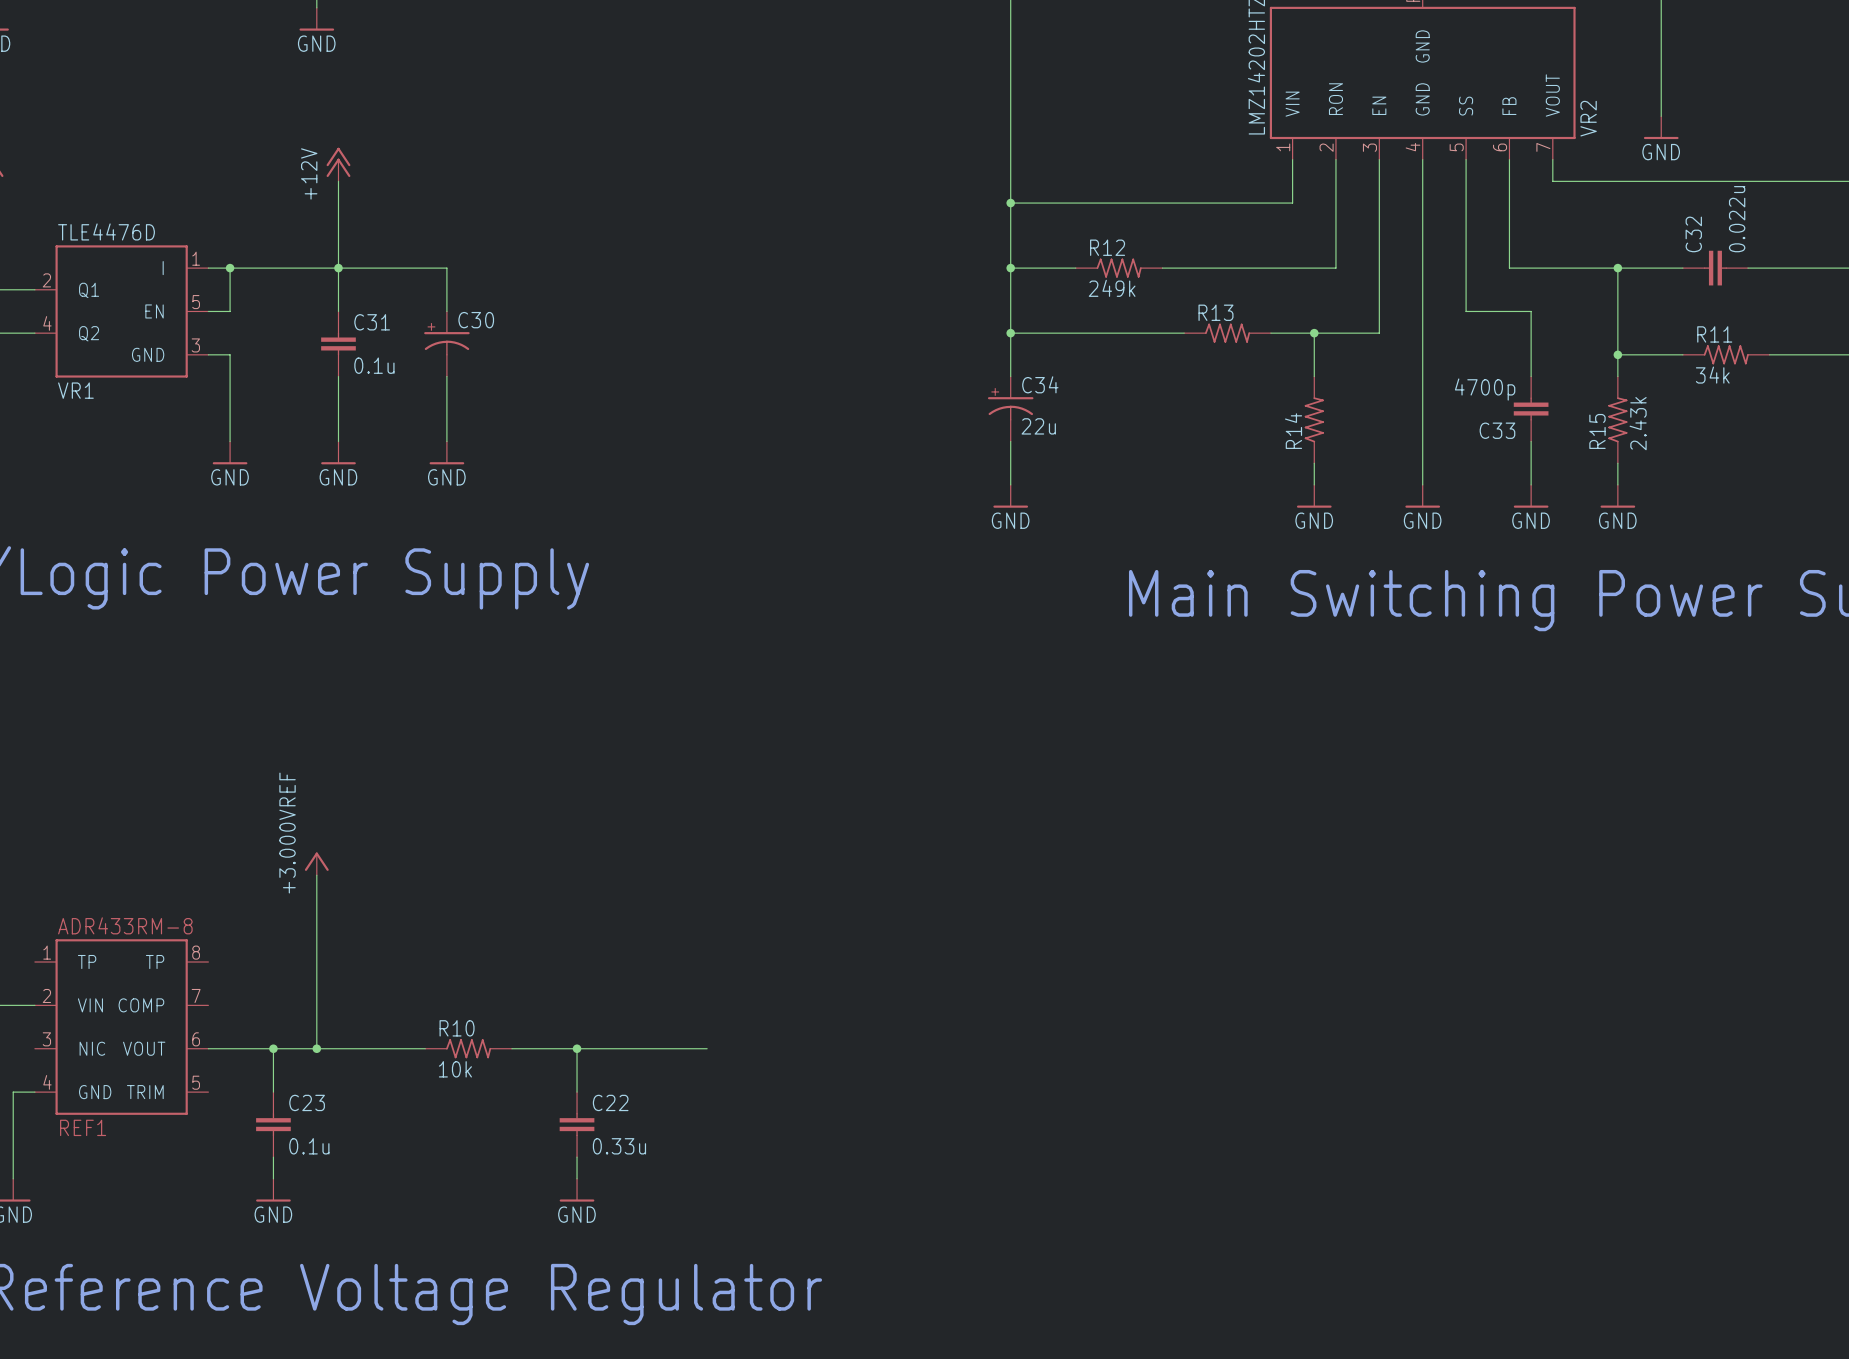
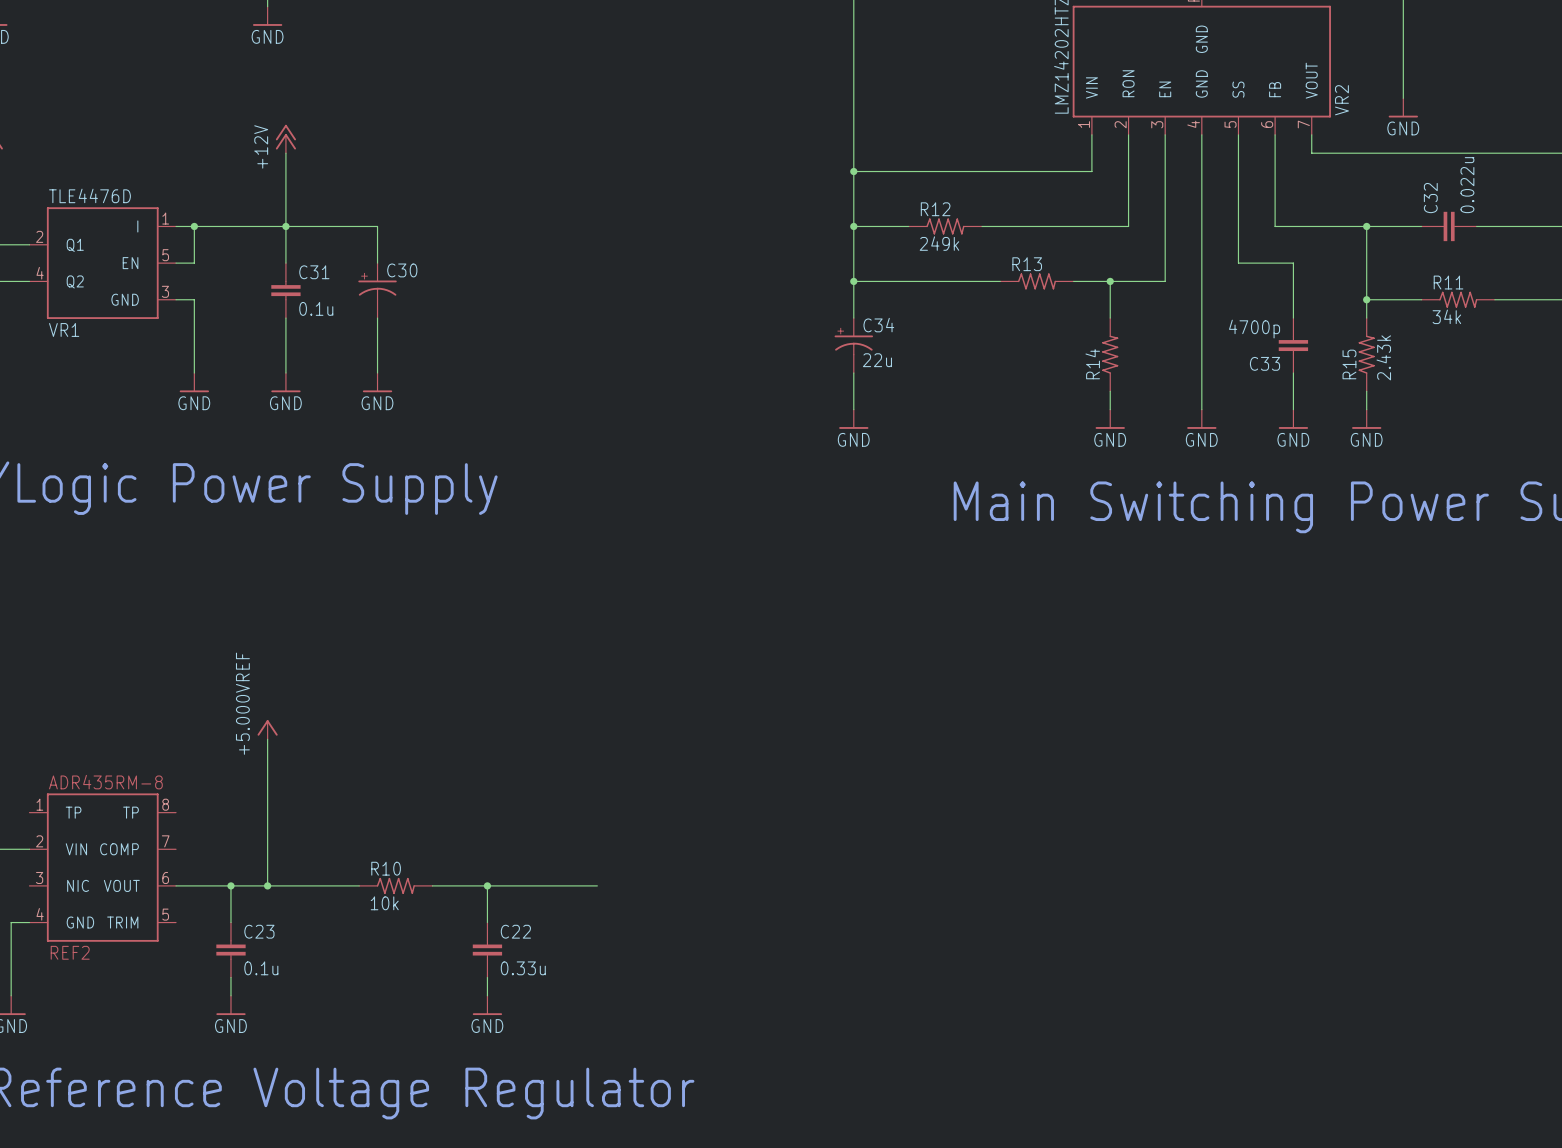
power symbol: +3.000VREF (316, 863) -> +5.000VREF (267, 729)
REF1 value: ADR433RM-8 (125, 925) -> ADR435RM-8 (105, 782)
REF1 name: REF1 (83, 1127) -> REF2 (70, 952)

